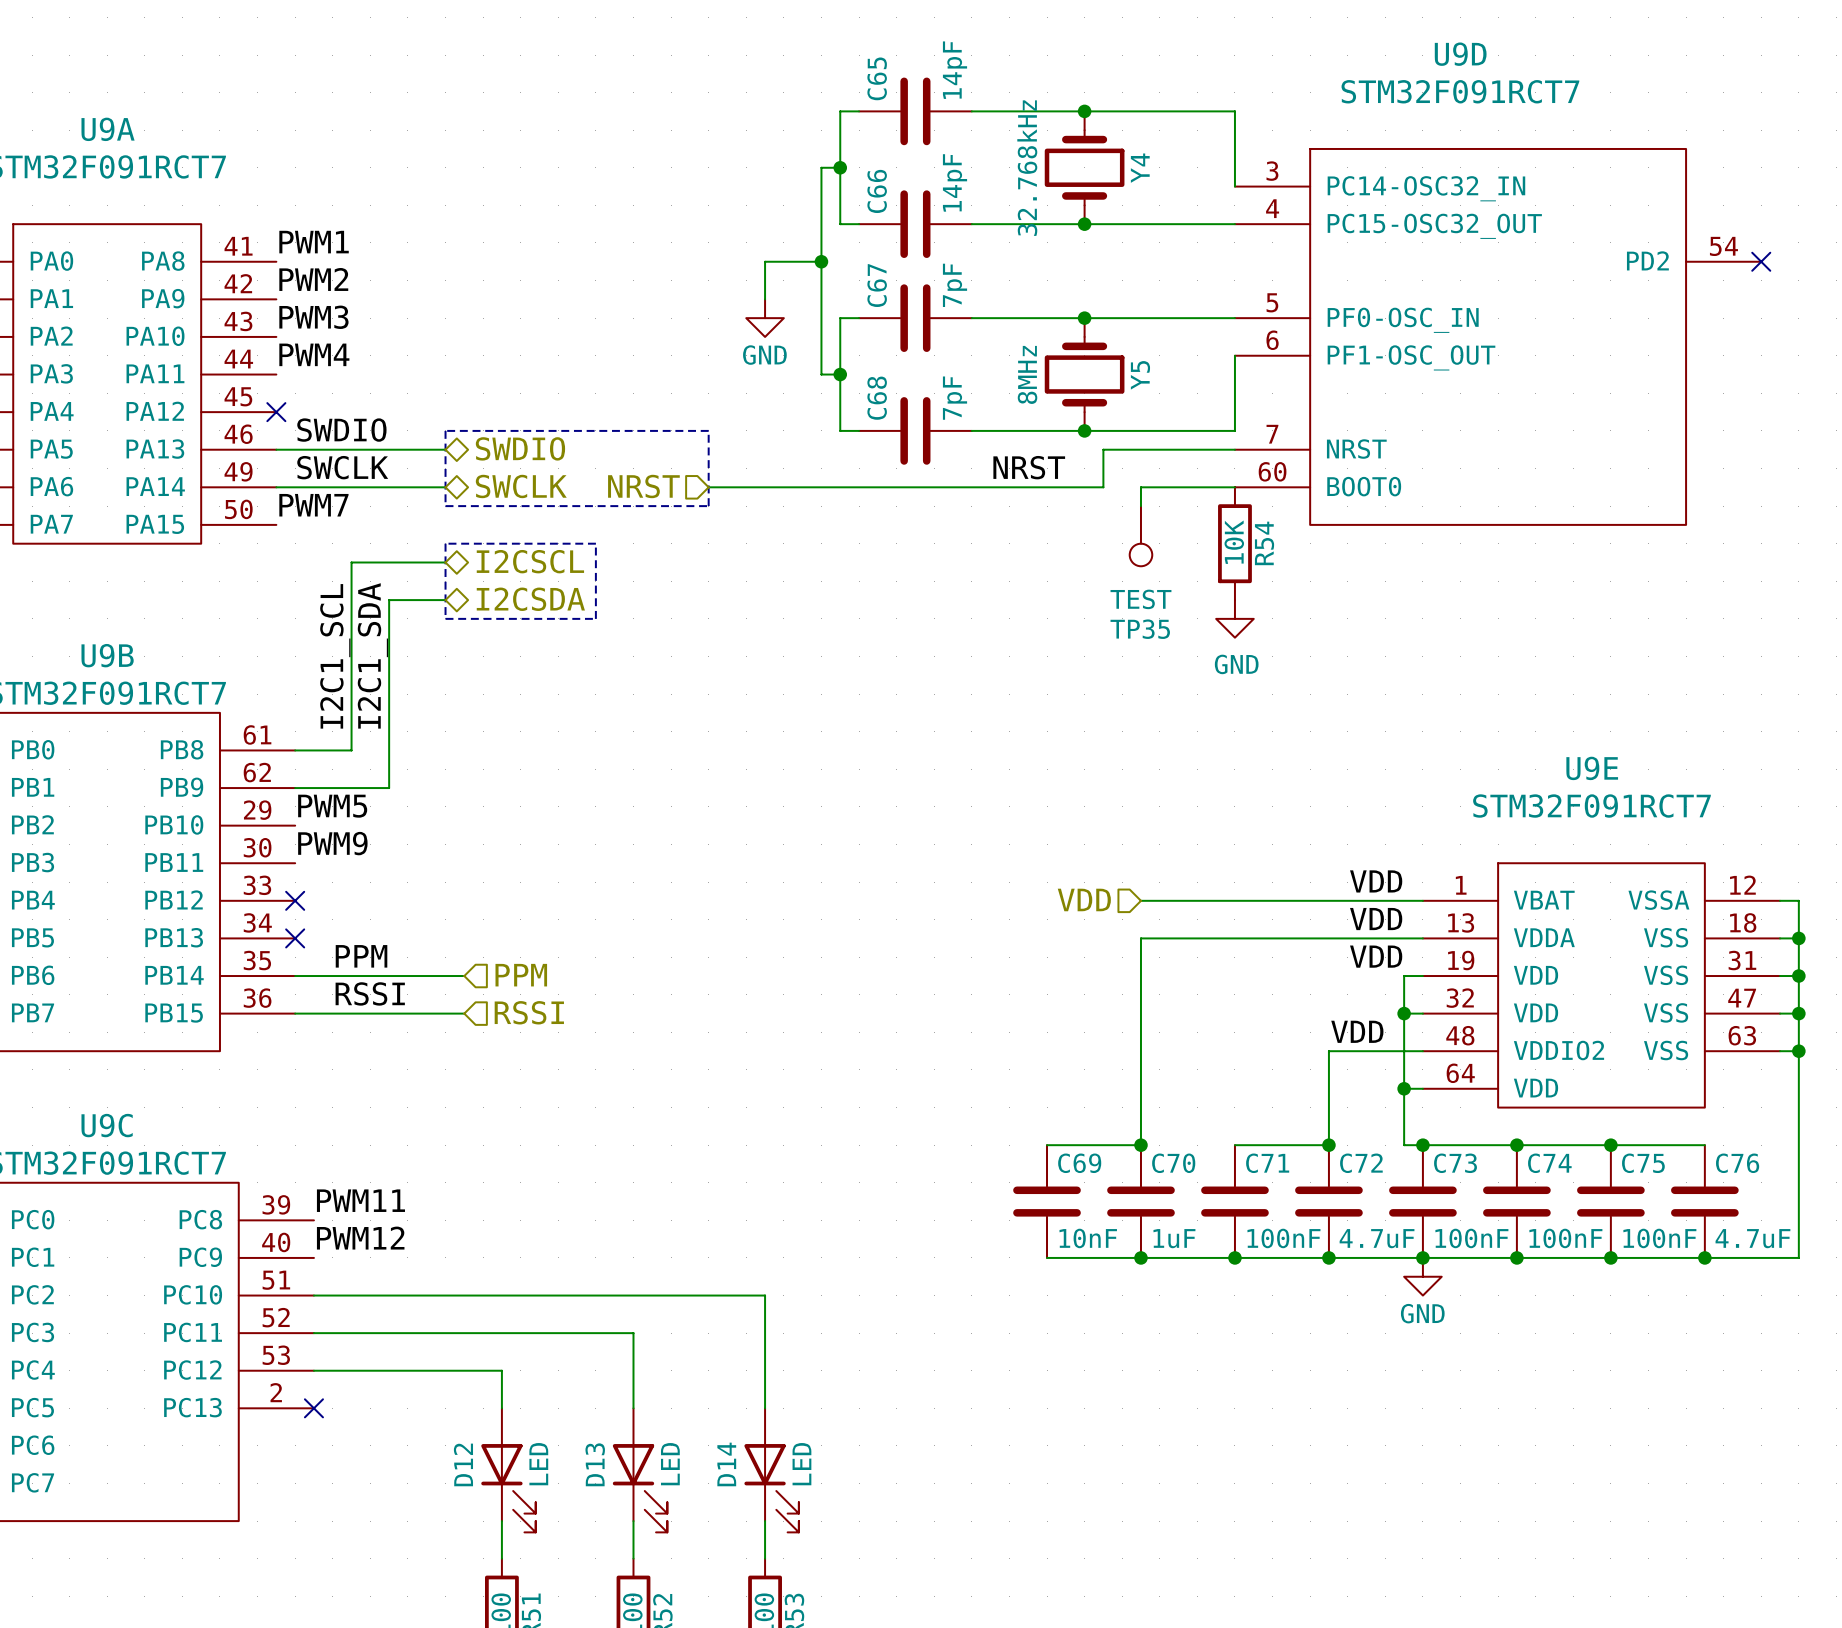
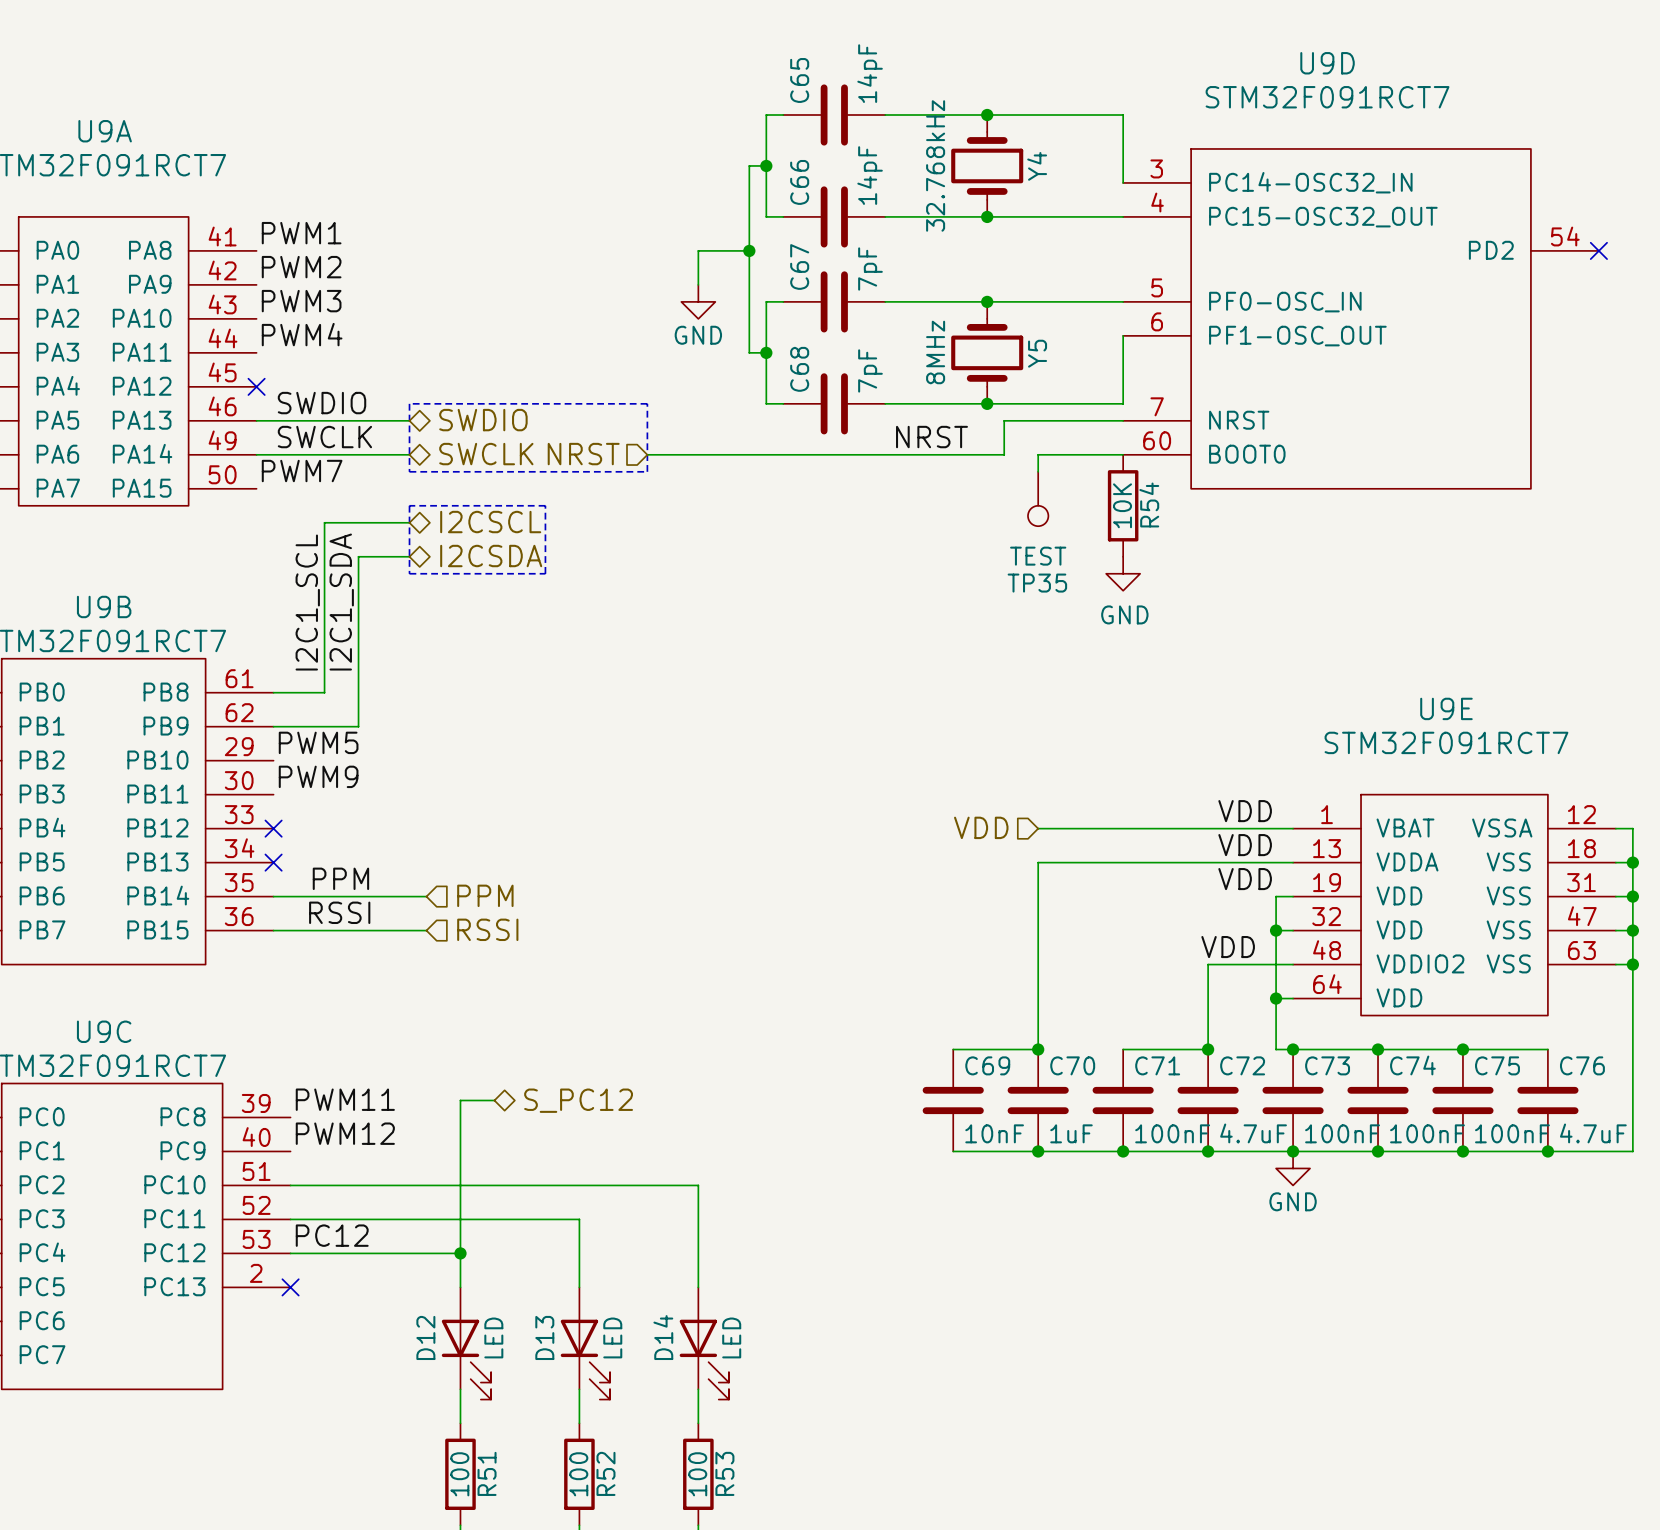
wire: none -> (494, 1100) (460, 1100) (460, 1253)
hierarchical label: none -> S_PC12 (578, 1100)
label: none -> PC12 (332, 1235)
junction: none -> (460, 1253)

